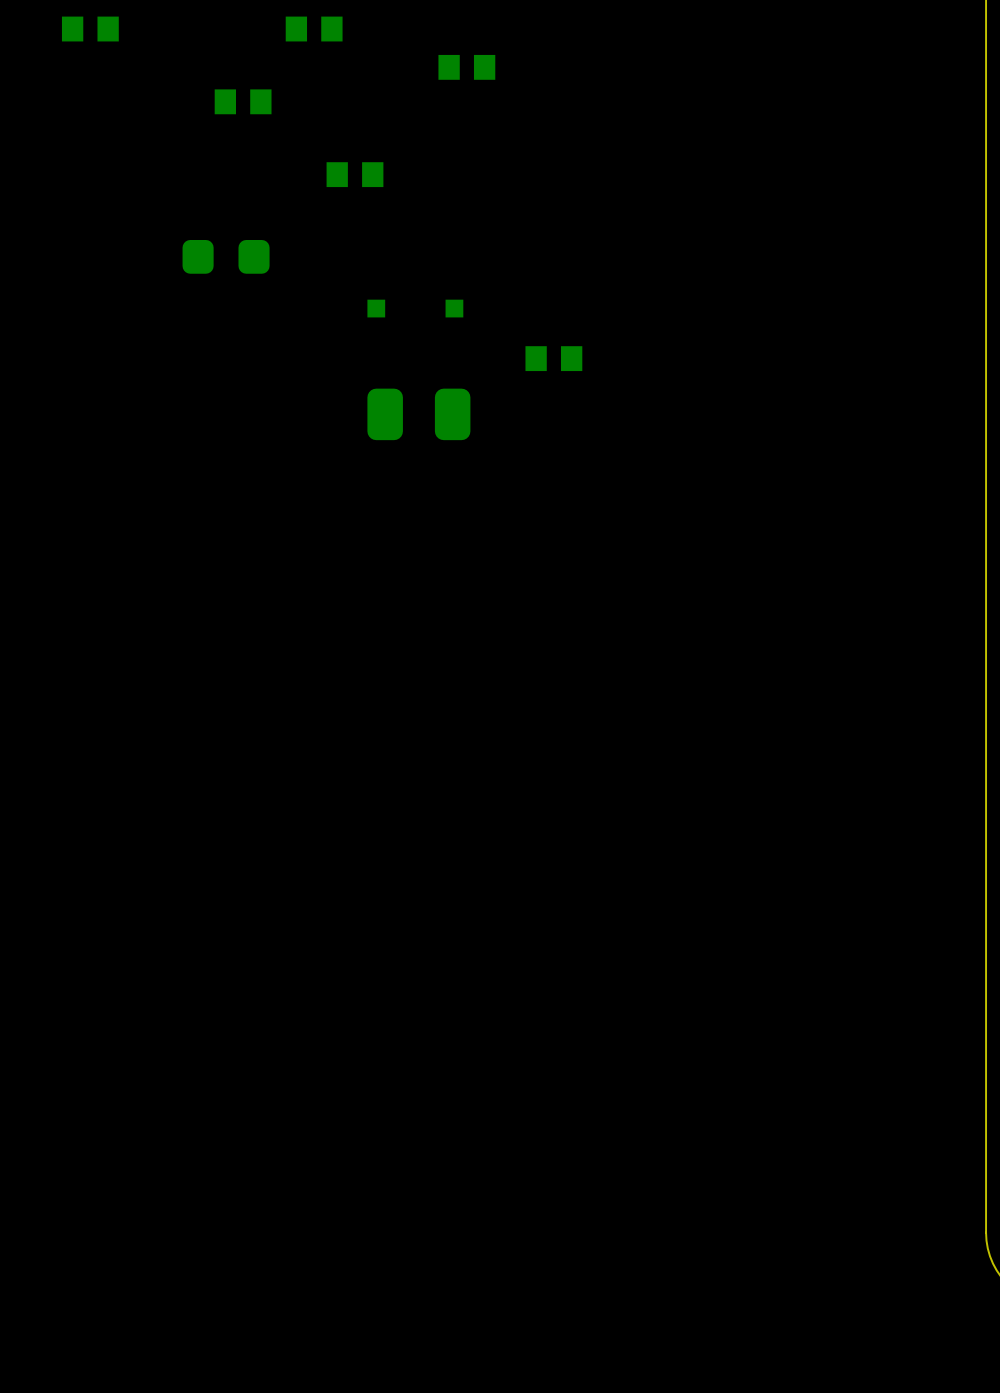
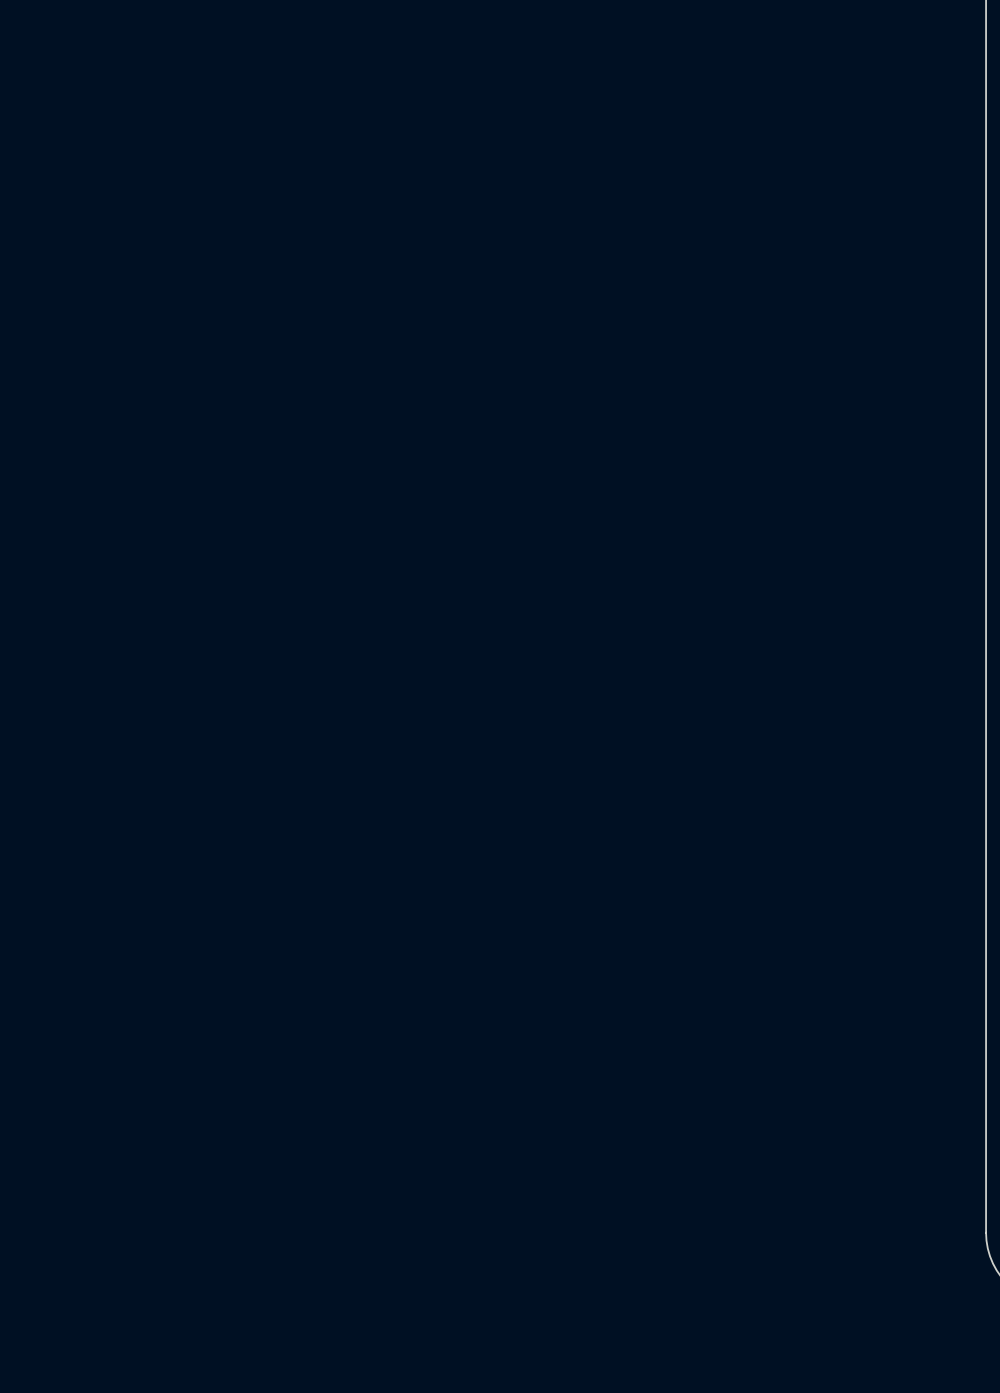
part: (90, 29) -> none
part: (314, 29) -> none
part: (466, 67) -> none
part: (243, 101) -> none
part: (354, 174) -> none
part: (226, 256) -> none
part: (415, 308) -> none
part: (553, 358) -> none
part: (418, 414) -> none

